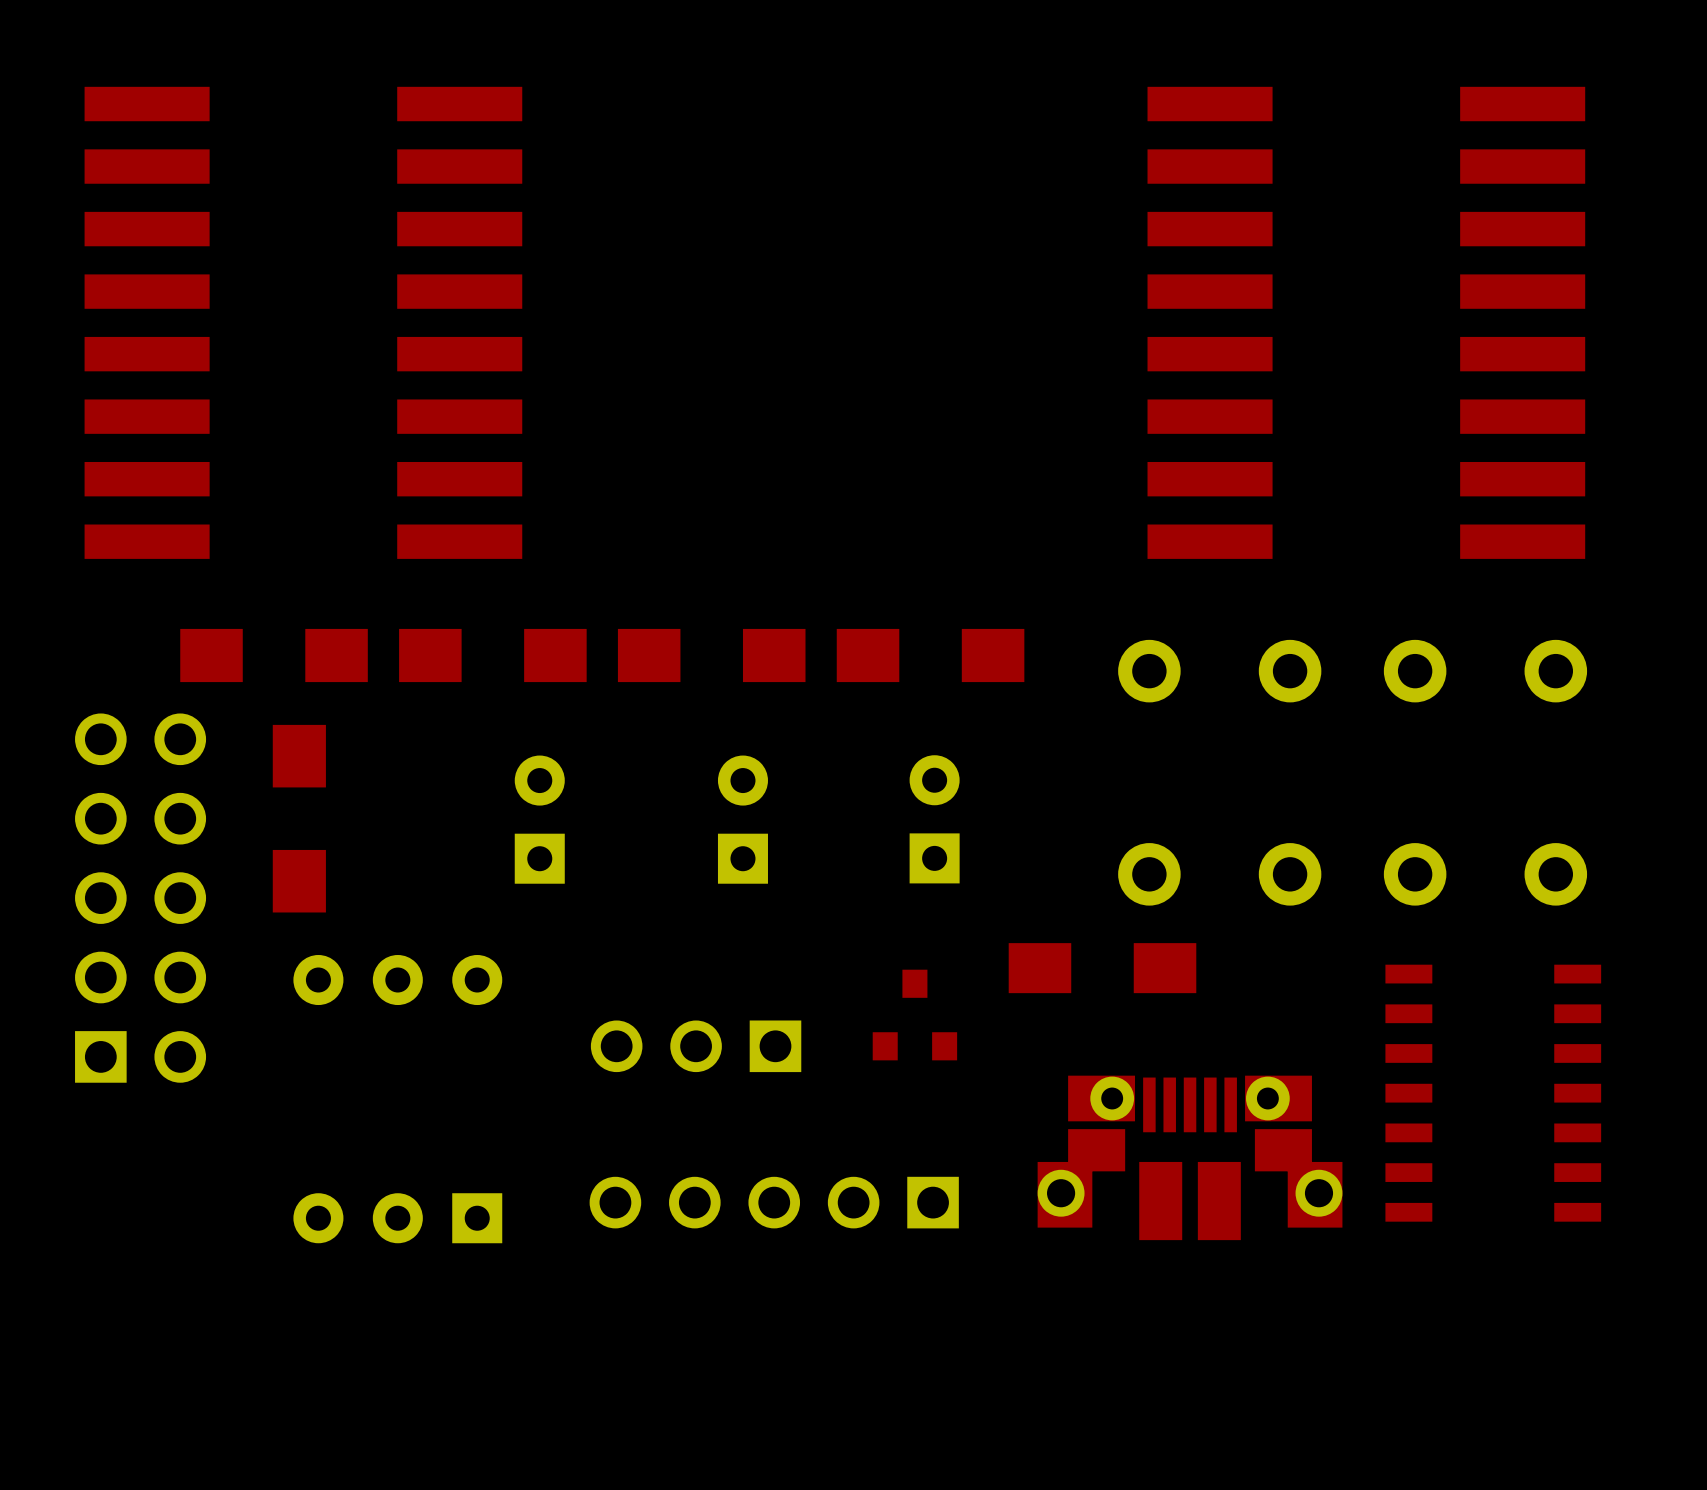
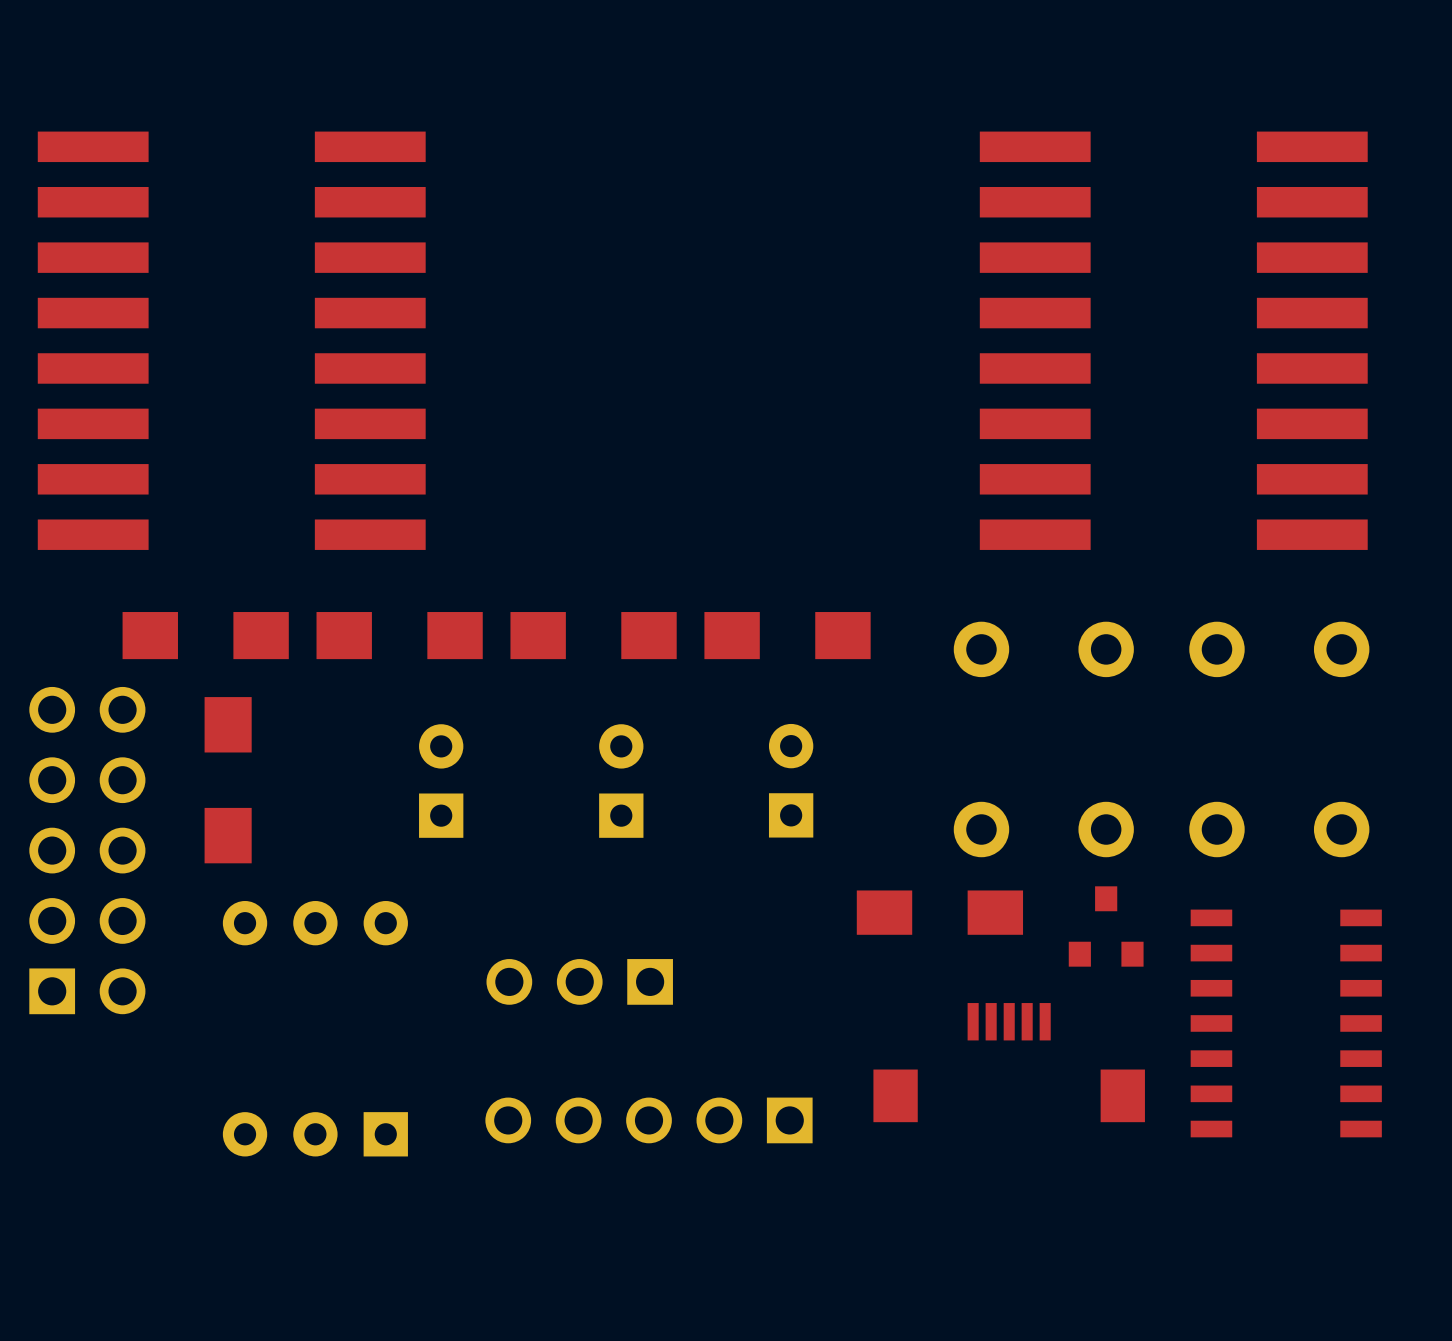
part position: (914, 1015) -> (1106, 926)
part footprint: [1037, 1075, 1343, 1241] -> [873, 1003, 1145, 1123]

